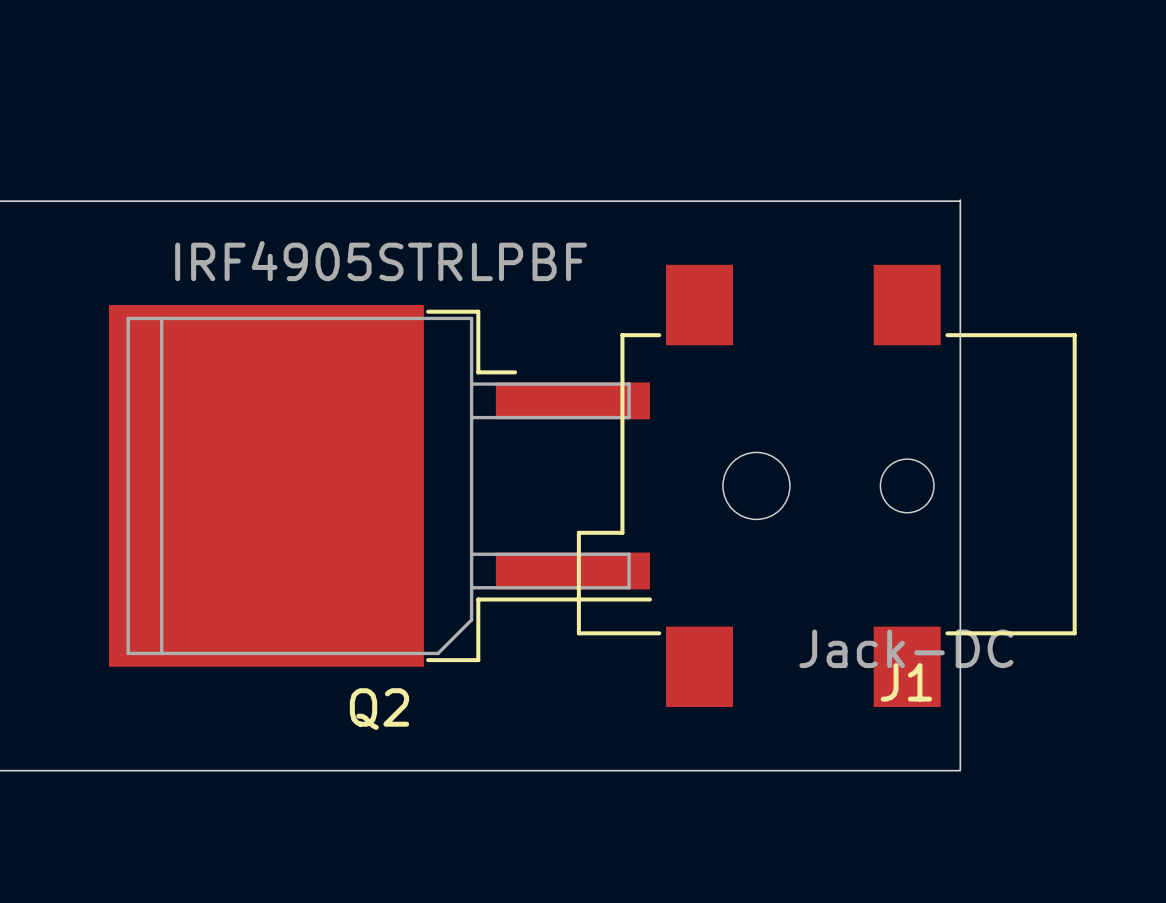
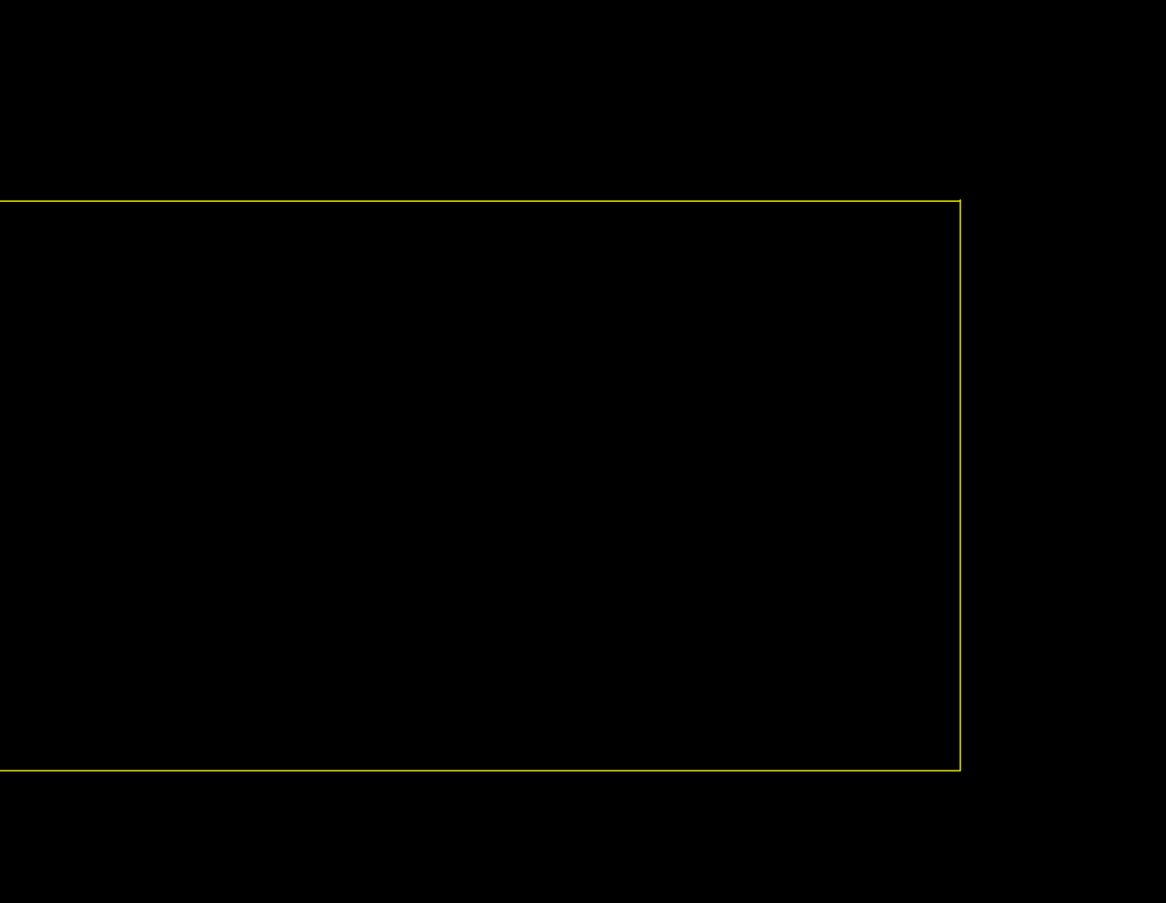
Q2: IRF4905STRLPBF (380, 485) -> none
J1: Jack-DC (826, 485) -> none

